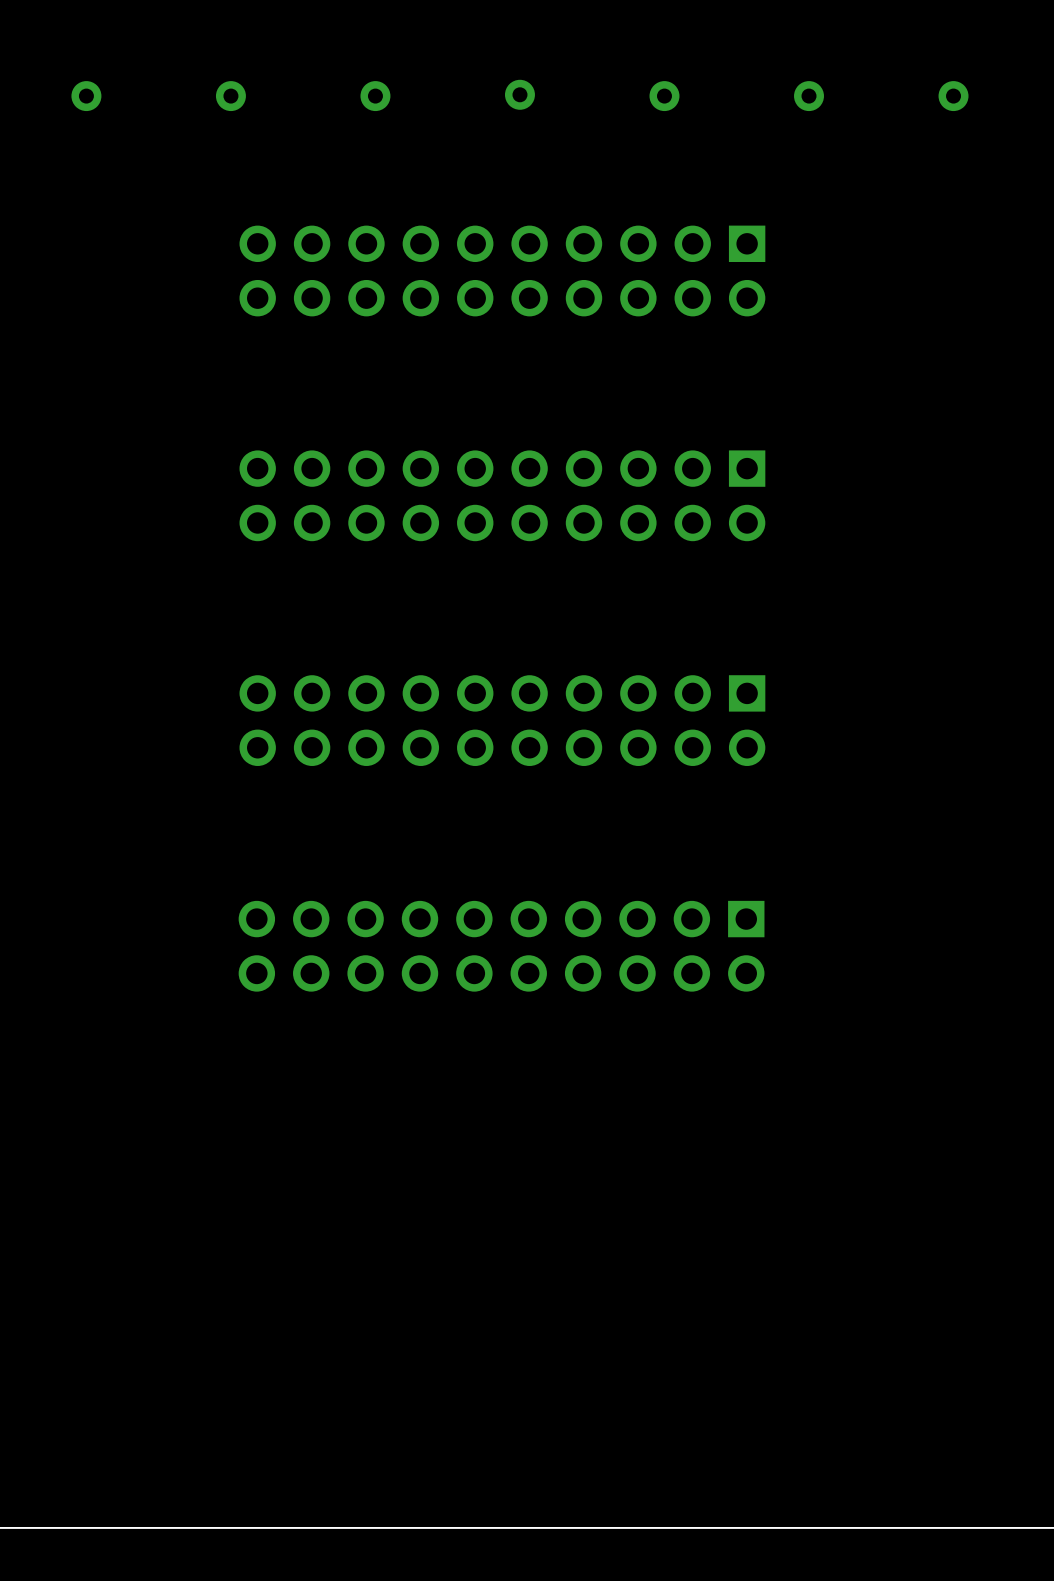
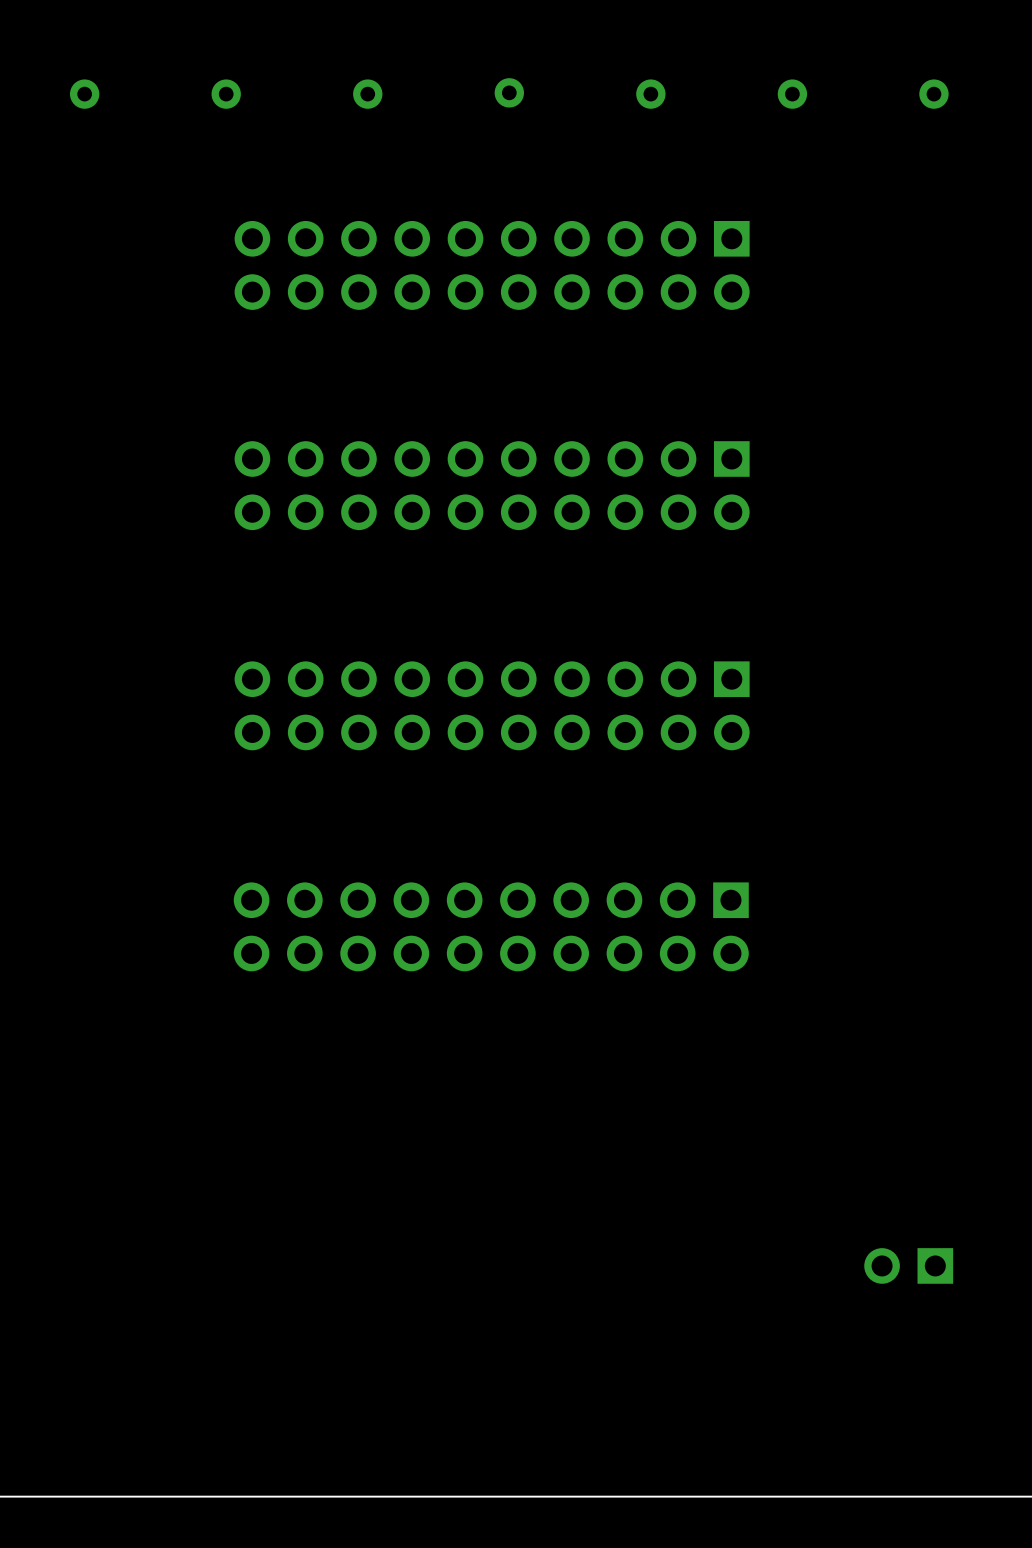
part: none -> (908, 1265)

